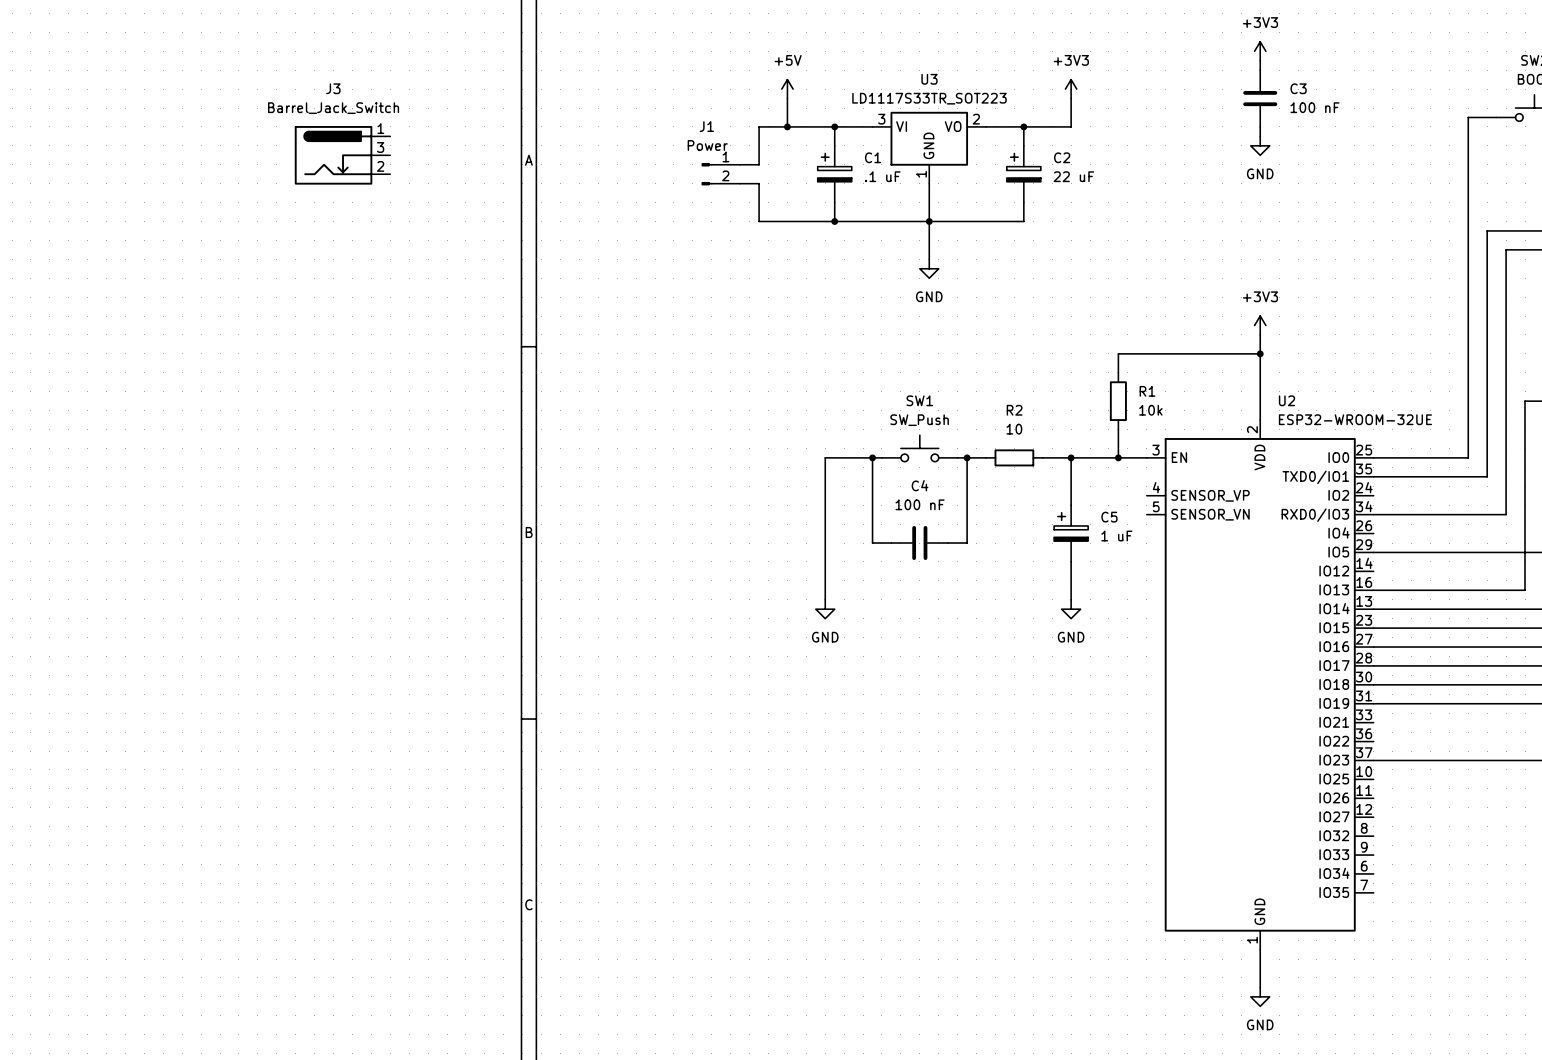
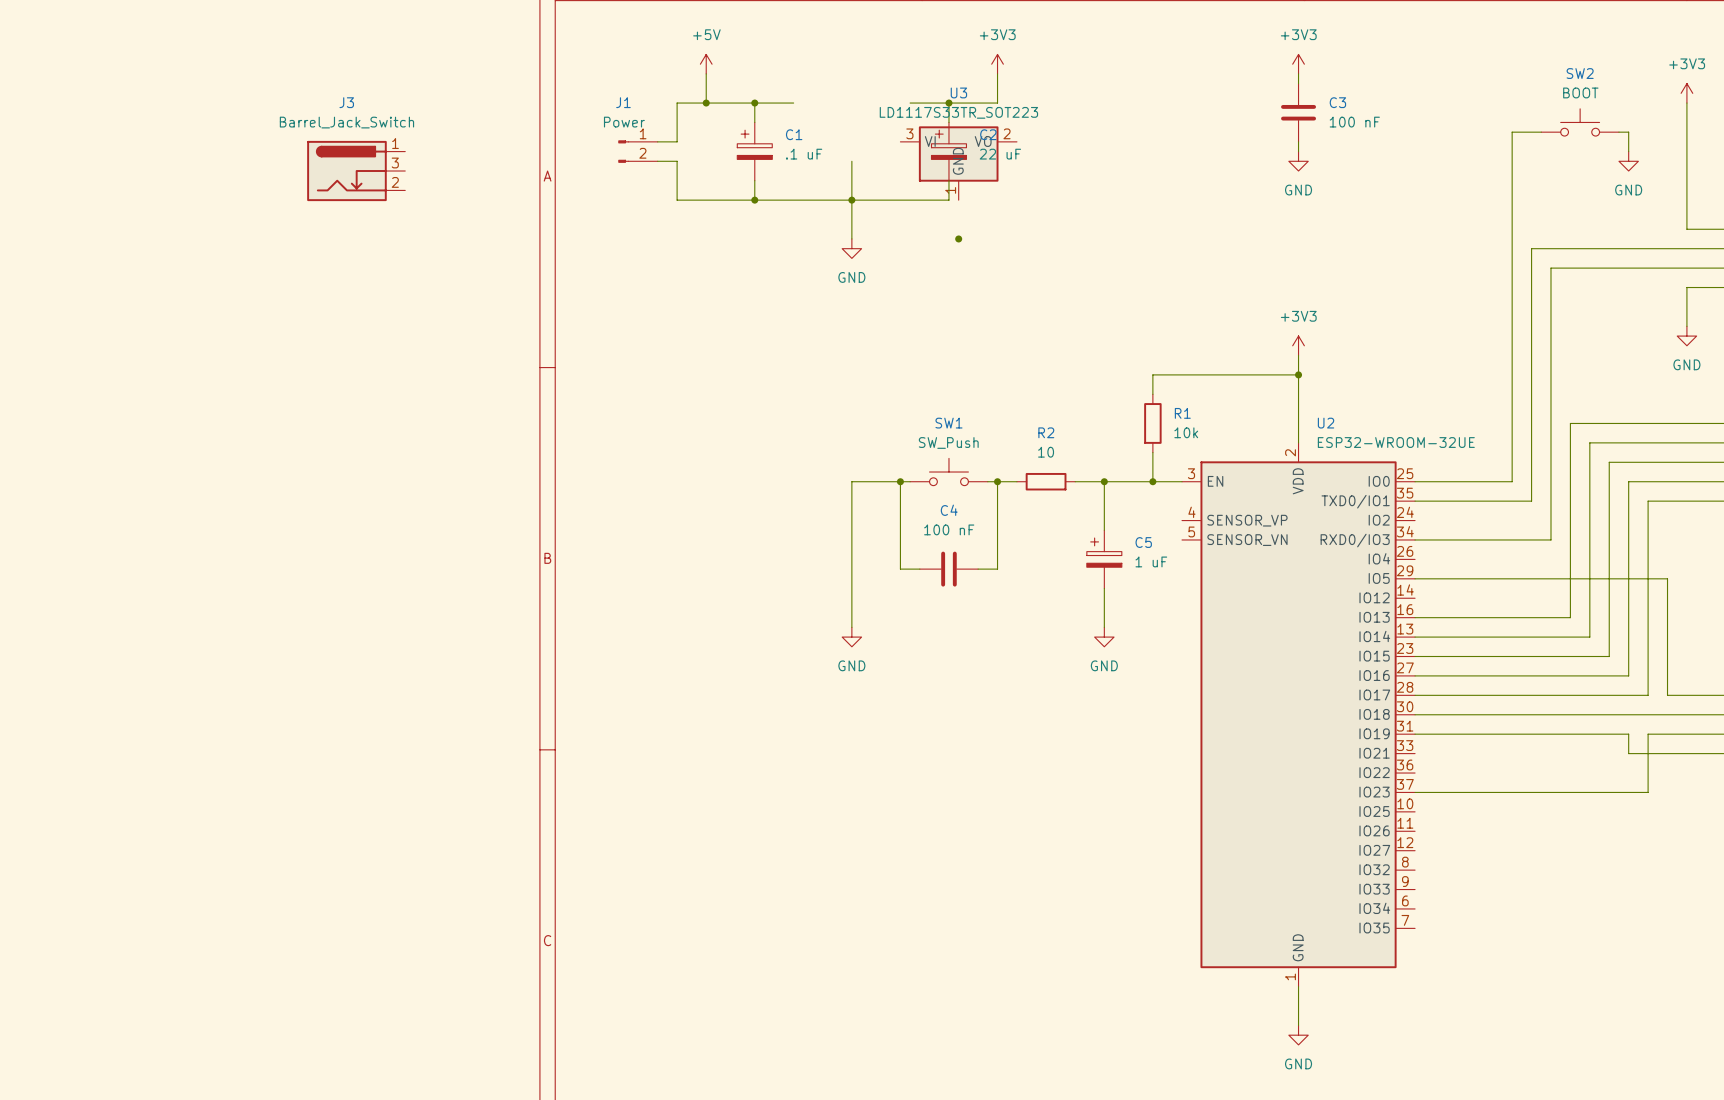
junction: none -> (706, 103)
junction: none -> (754, 103)
power symbol position: +5V (787, 89) -> +5V (706, 64)
junction: none -> (948, 103)
power symbol position: +3V3 (1071, 89) -> +3V3 (997, 64)
wire: (787, 98) (787, 126) -> (706, 73) (706, 103)
wire: (1071, 98) (1071, 126) (986, 126) -> (997, 73) (997, 103) (910, 103)
junction: (787, 126) -> none
wire: (834, 126) (834, 145) -> (754, 103) (754, 122)
junction: (834, 126) -> none
wire: (872, 126) (759, 126) (759, 164) (740, 164) -> (793, 103) (677, 103) (677, 141) (657, 141)
wire: (1023, 126) (1023, 145) -> (948, 103) (948, 122)
junction: (1023, 126) -> none
wire: none -> (657, 161) (677, 161) (677, 200) (764, 200)
J1 position: (720, 174) -> (637, 151)
C1 position: (834, 174) -> (754, 151)
C2 position: (1023, 174) -> (948, 151)
junction: none -> (754, 200)
wire: (759, 183) (759, 221) (1023, 221) (1023, 202) -> (783, 200) (948, 200) (948, 180)
junction: none -> (851, 200)
wire: (929, 183) (929, 259) -> (851, 161) (851, 238)
wire: (834, 202) (834, 221) -> (754, 180) (754, 200)
junction: (834, 221) -> none
power symbol position: GND (929, 268) -> GND (851, 248)

